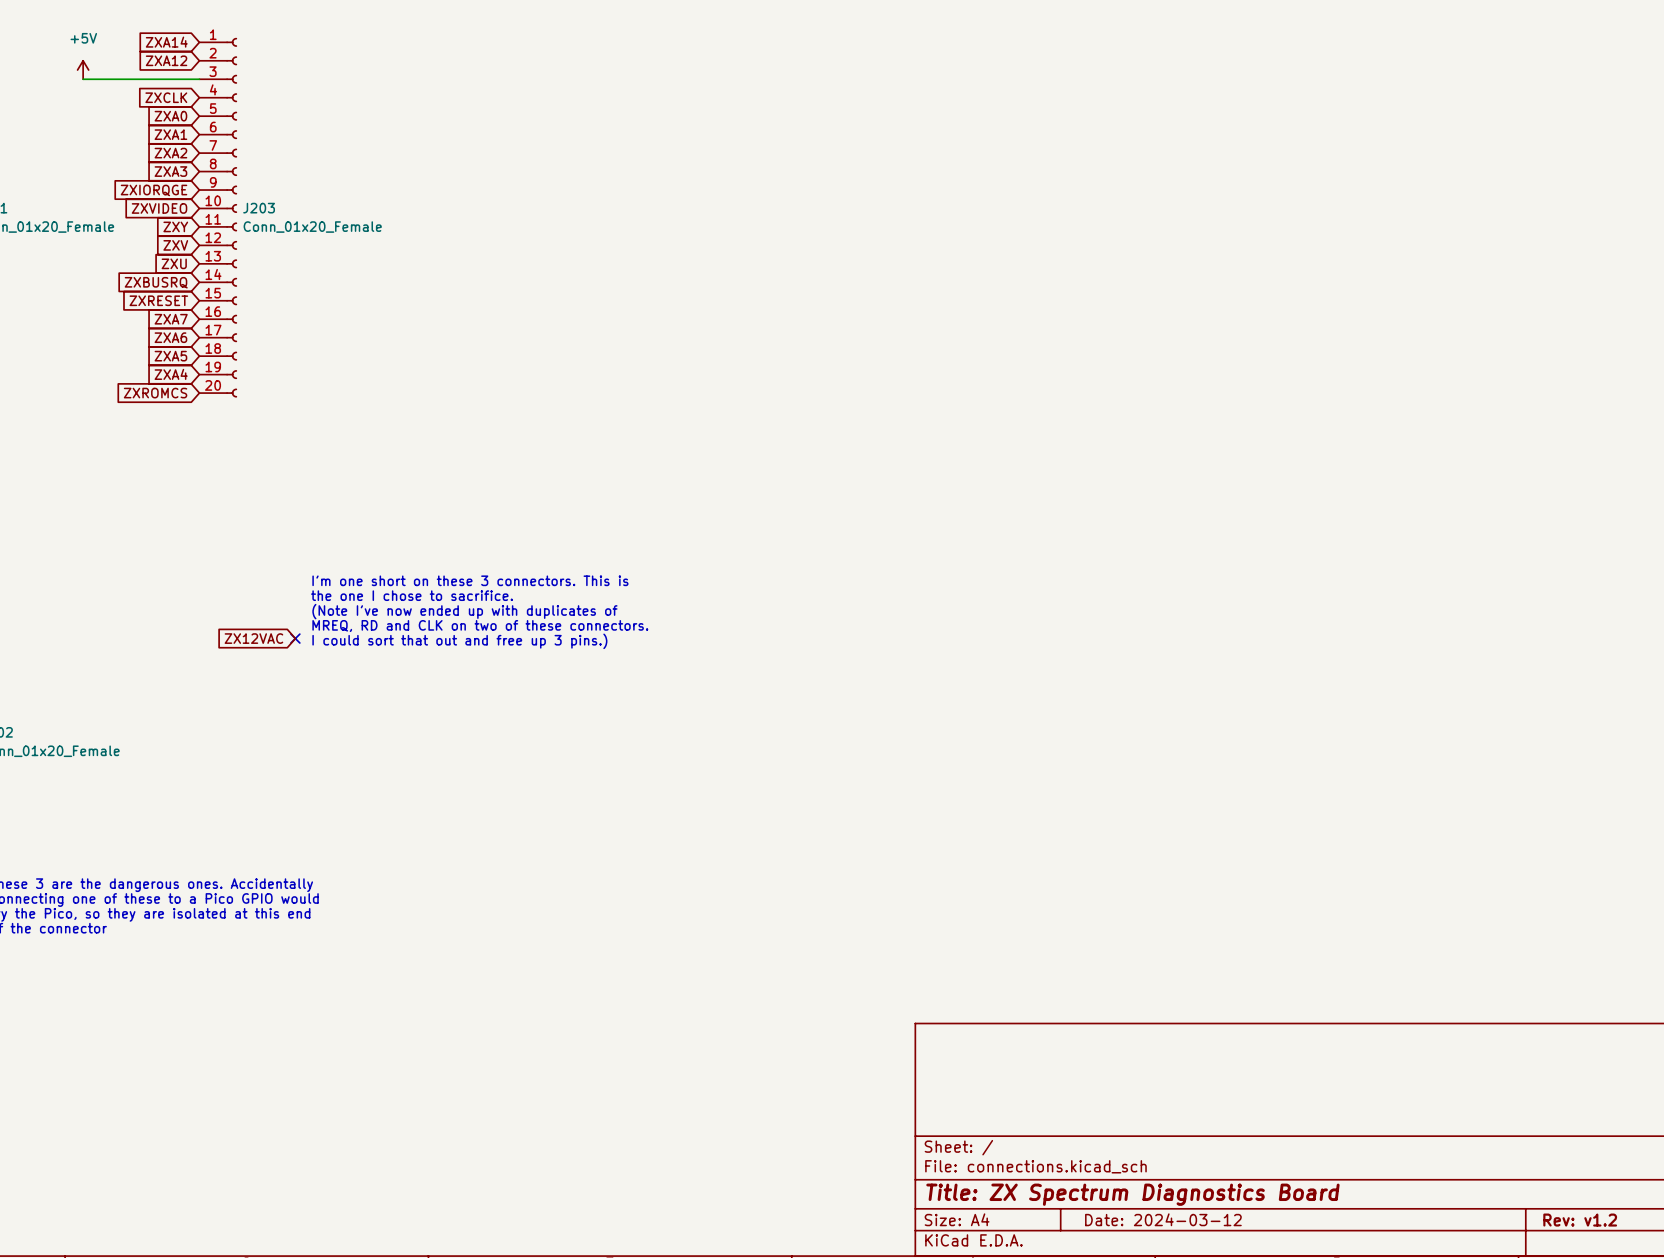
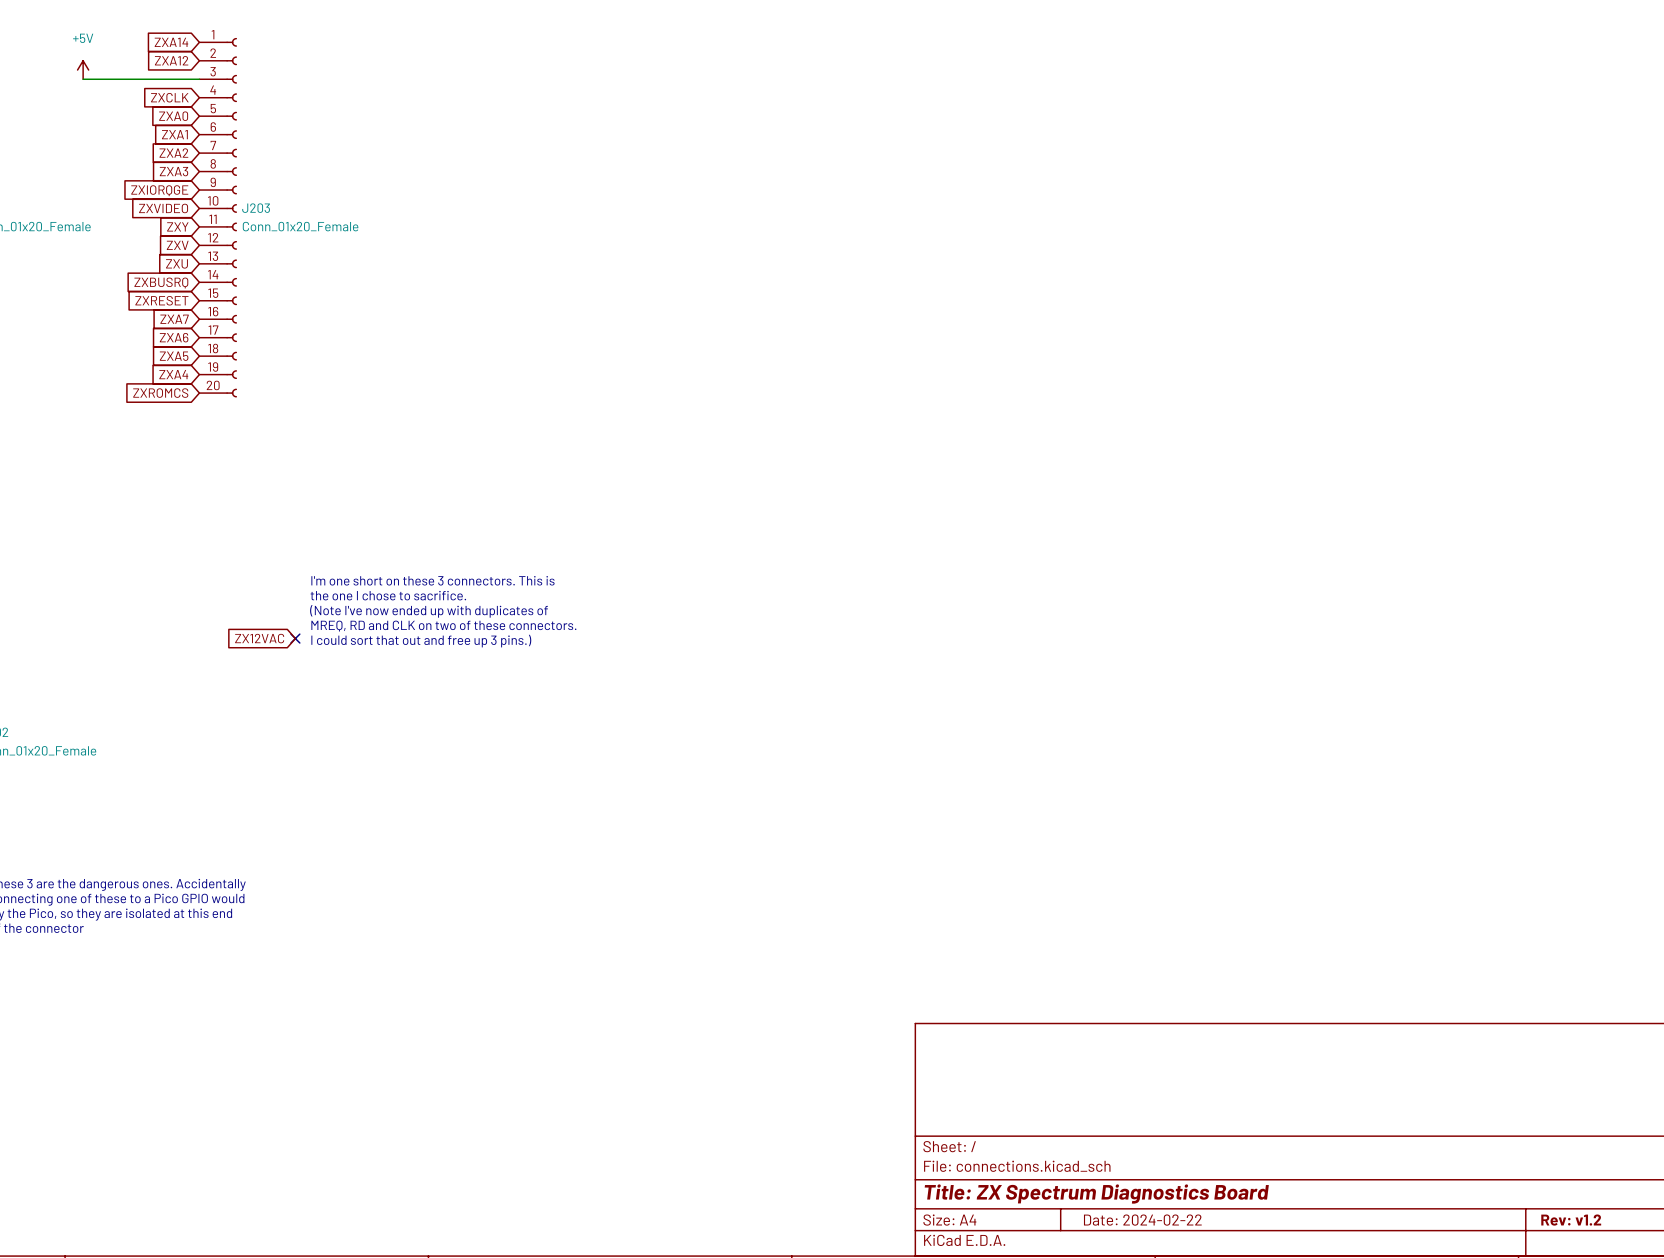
title block: Date: 2024-03-12 (1163, 1219) -> Date: 2024-02-22 (1142, 1220)

